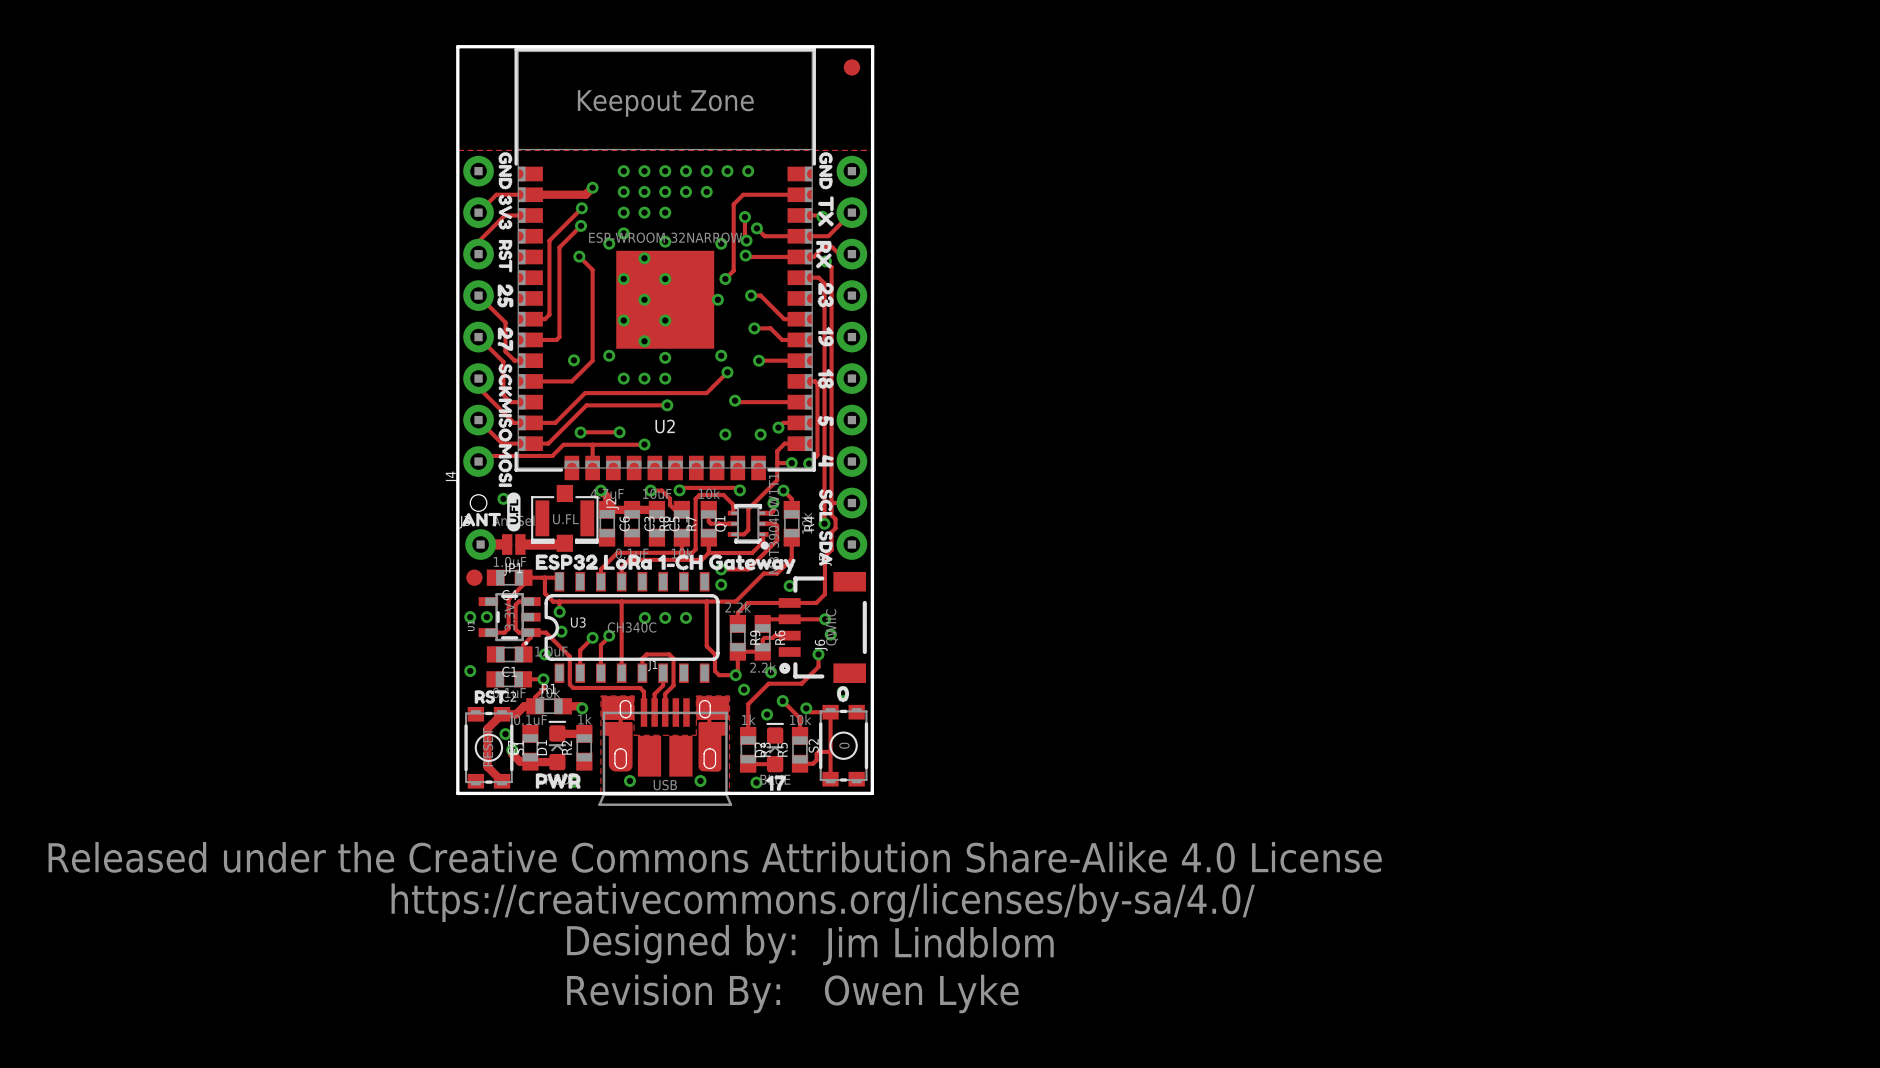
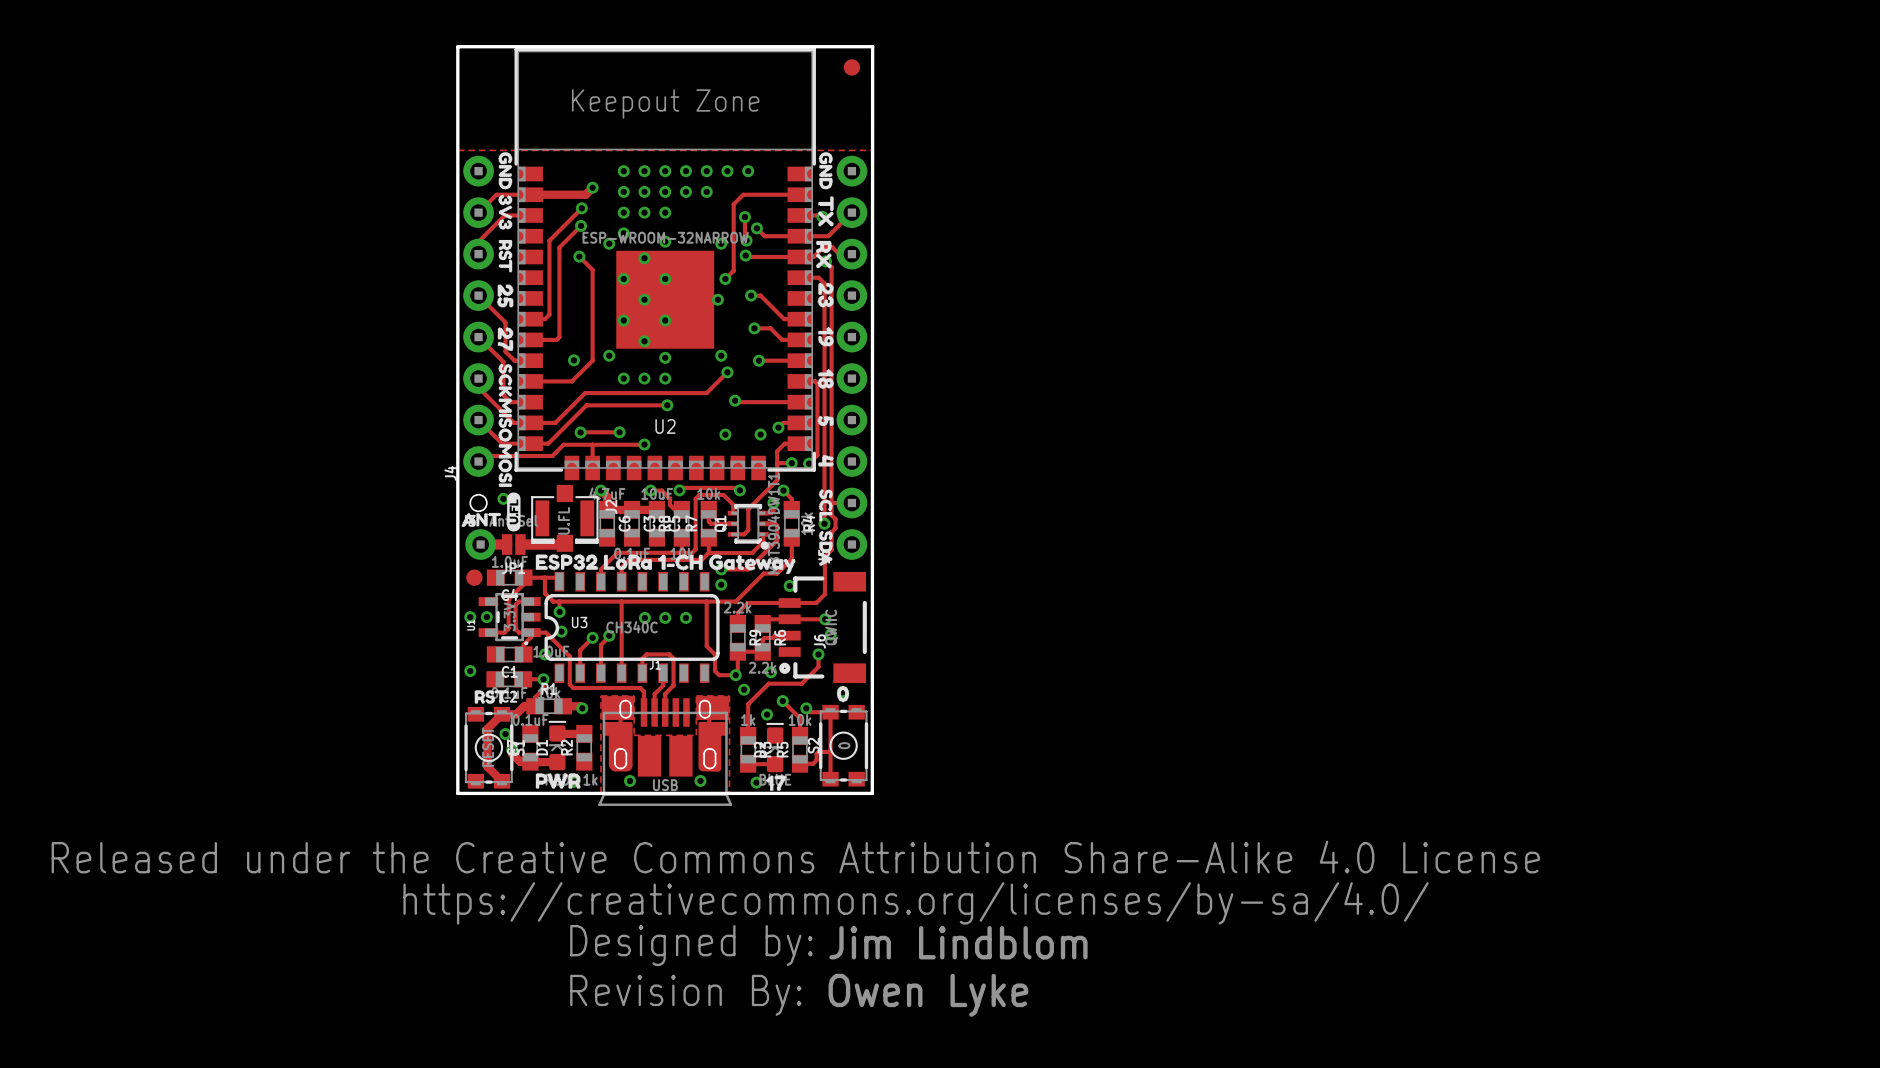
J2 value rotation: 0° (565, 519) -> 90° counterclockwise (564, 520)
R2 value position: 1k (584, 719) -> 1k (590, 779)

